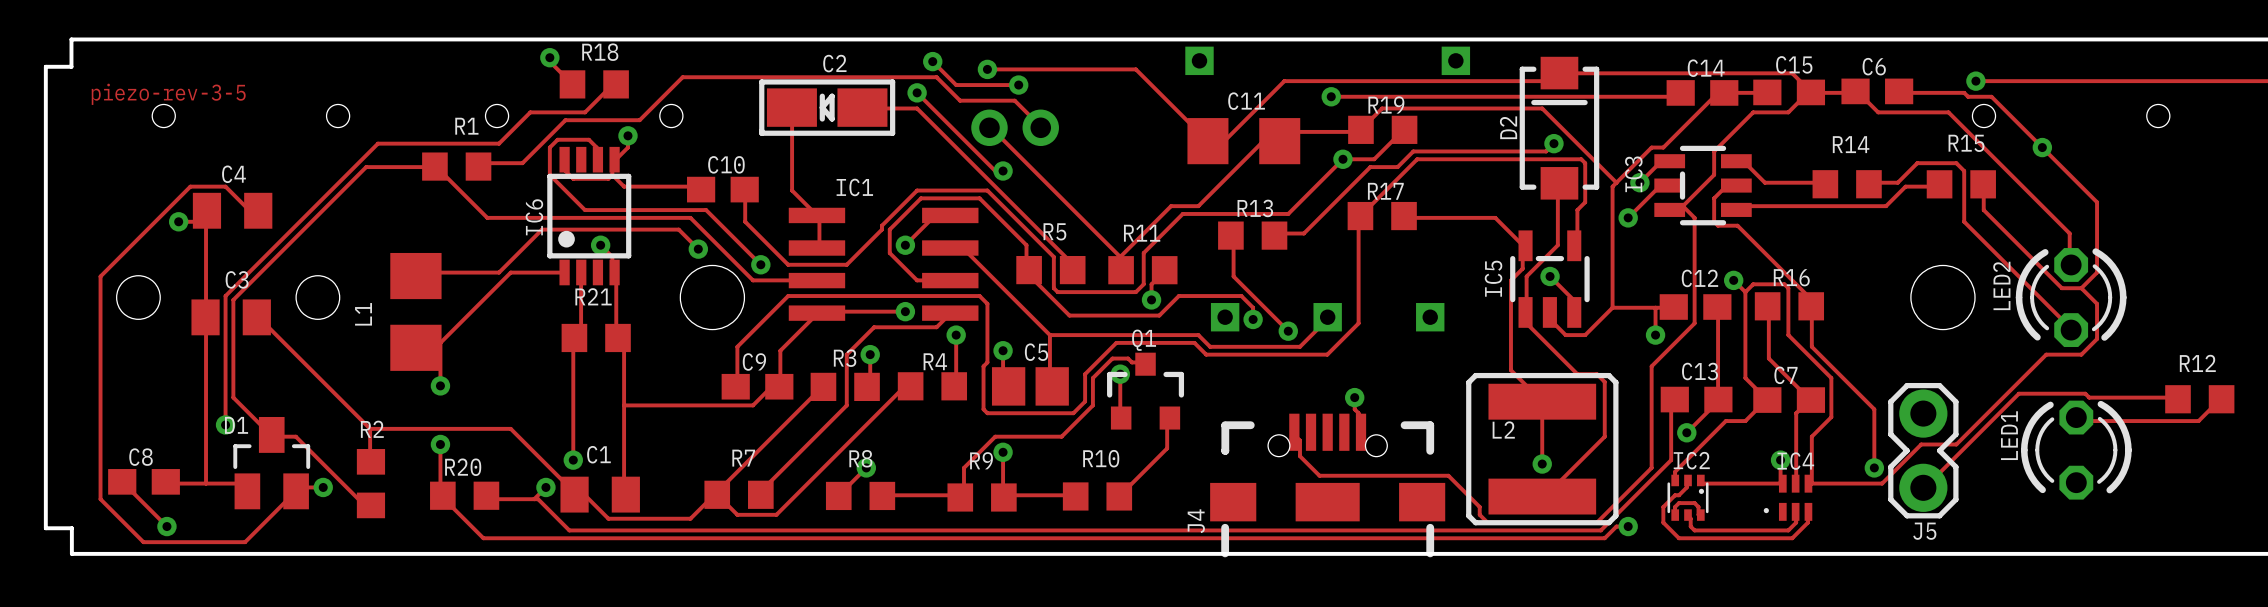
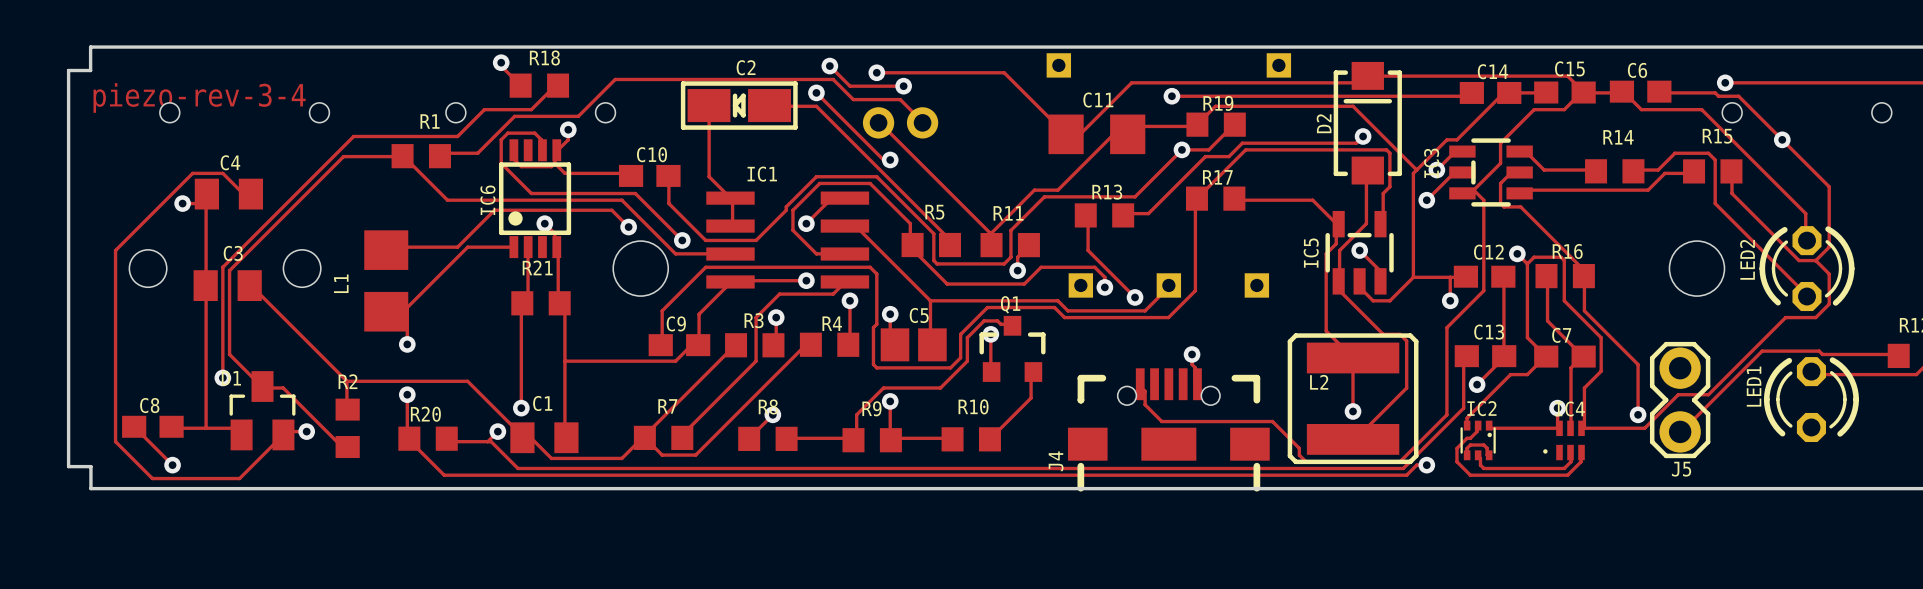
text: piezo-rev-3-5 (168, 94) -> piezo-rev-3-4 (199, 97)

